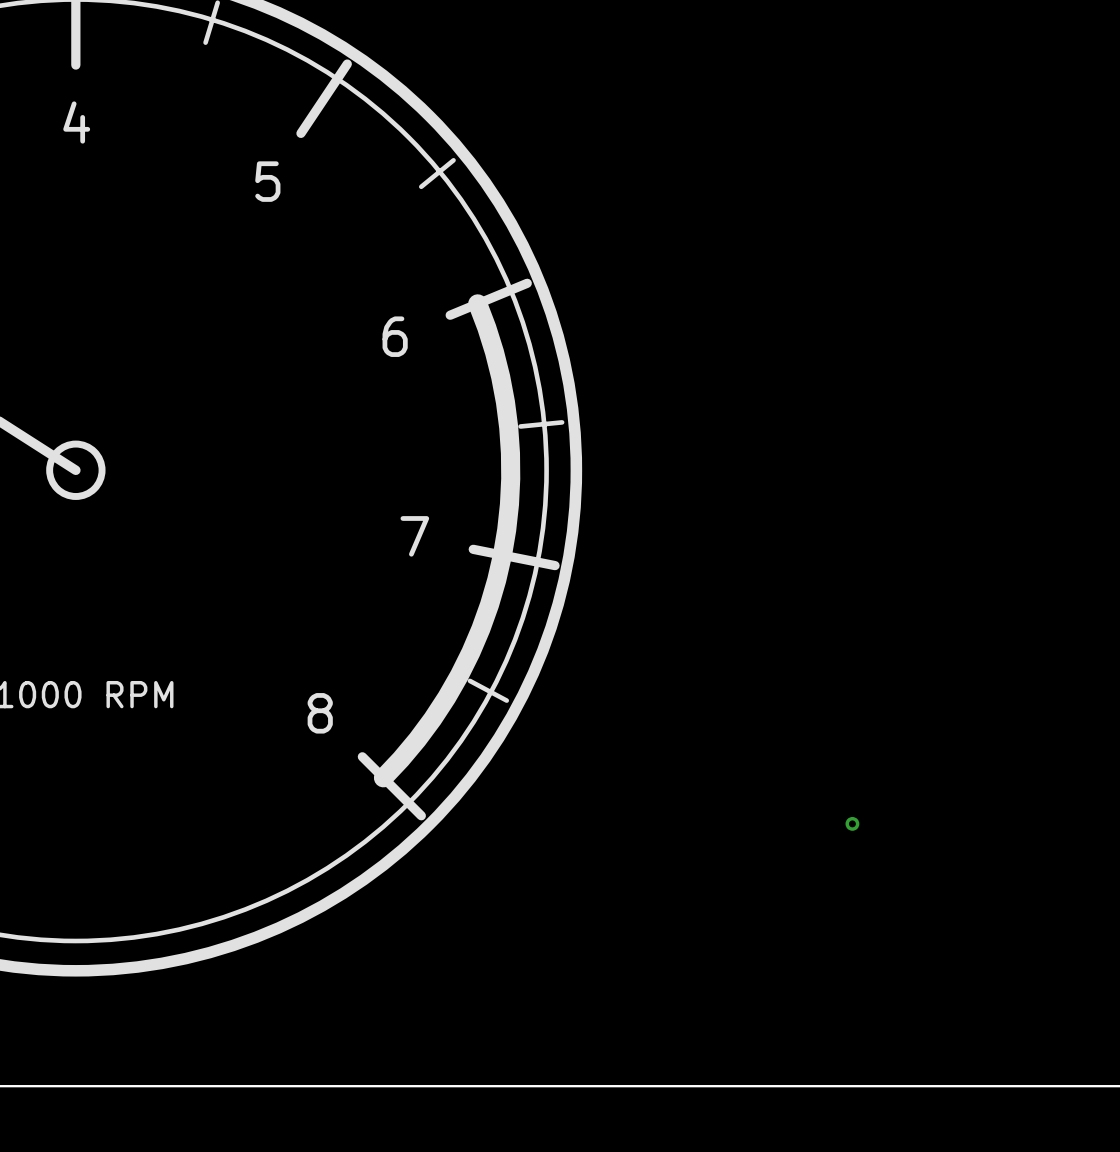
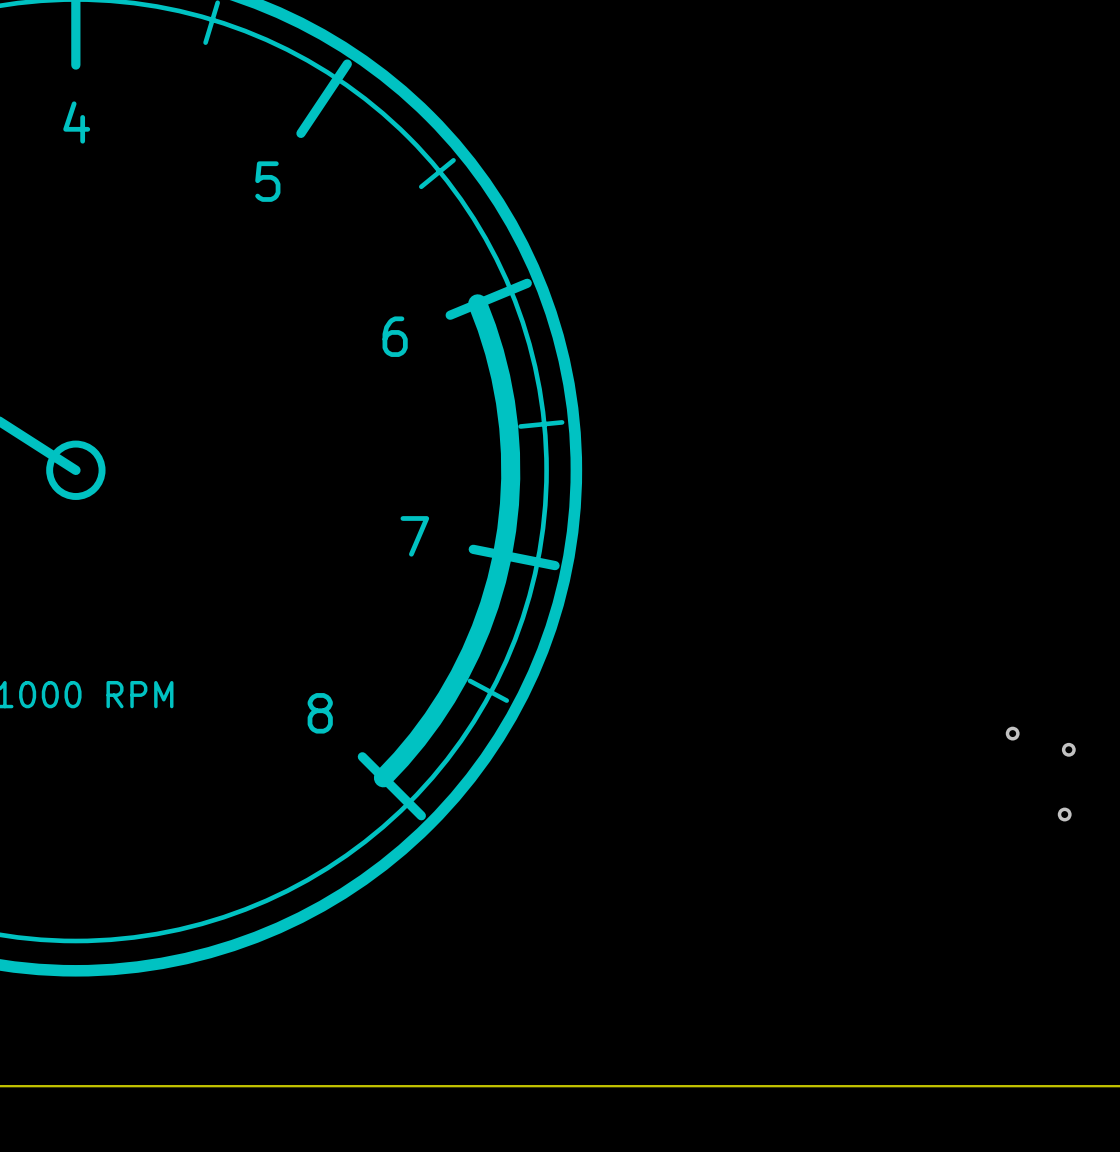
via: none -> (1012, 733)
via: none -> (1068, 749)
via: none -> (1064, 814)
via: (852, 823) -> none

